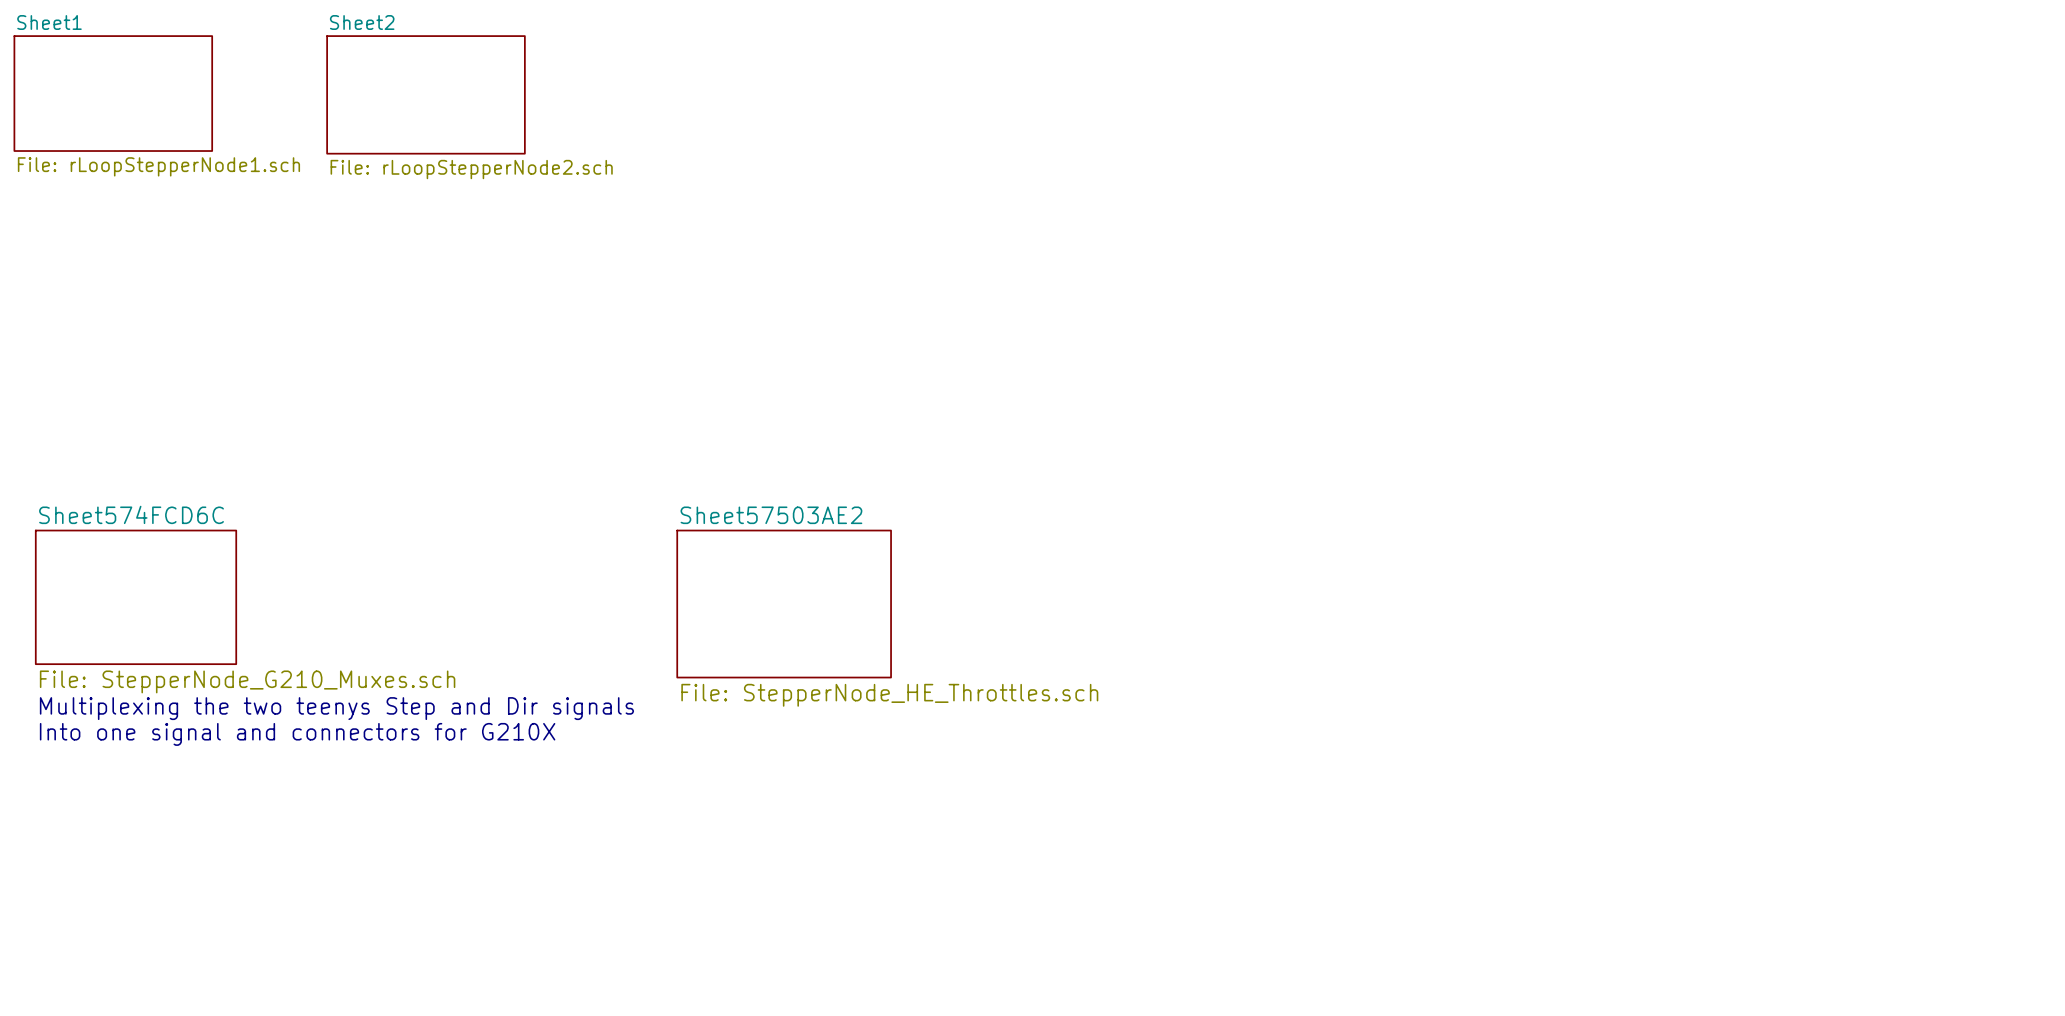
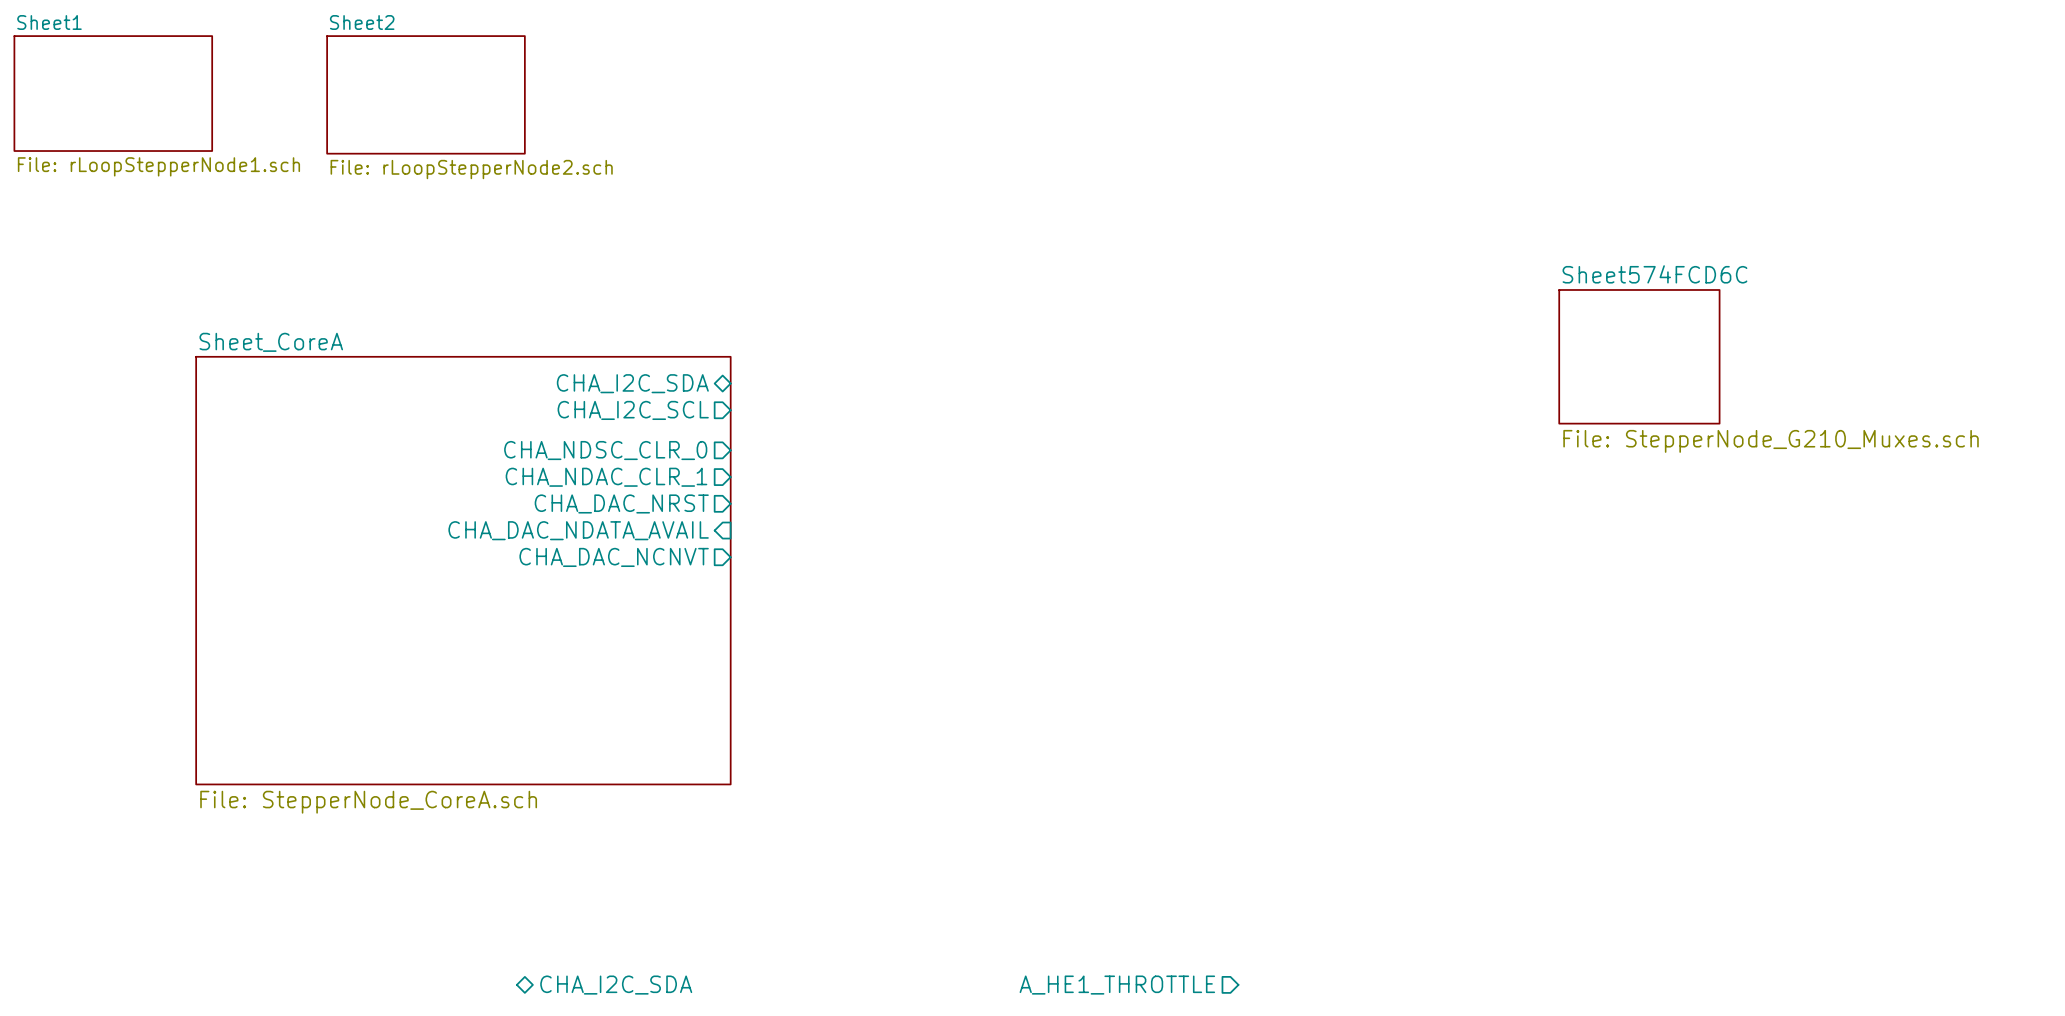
sheet pin: none -> CHA_I2C_SDA (632, 383)
sheet pin: none -> CHA_I2C_SCL (633, 410)
sheet pin: none -> CHA_NDSC_CLR_0 (605, 450)
sheet pin: none -> CHA_NDAC_CLR_1 (606, 477)
sheet pin: none -> CHA_DAC_NRST (621, 503)
sheet Sheet574FCD6C shape: [35, 530, 237, 665] -> [1559, 289, 1720, 424]
sheet pin: none -> CHA_DAC_NDATA_AVAIL (578, 530)
sheet pin: none -> CHA_DAC_NCNVT (614, 557)
sheet Sheet_CoreA: none -> File: StepperNode_CoreA.sch (463, 570)
sheet Sheet57503AE2: File: StepperNode_HE_Throttles.sch (784, 604) -> none
text: Multiplexing the two teenys Step and Dir signals (336, 708) -> none
text: Into one signal and connectors for G210X (297, 734) -> none
sheet pin: none -> CHA_I2C_SDA (616, 985)
sheet pin: none -> A_HE1_THROTTLE (1117, 985)

